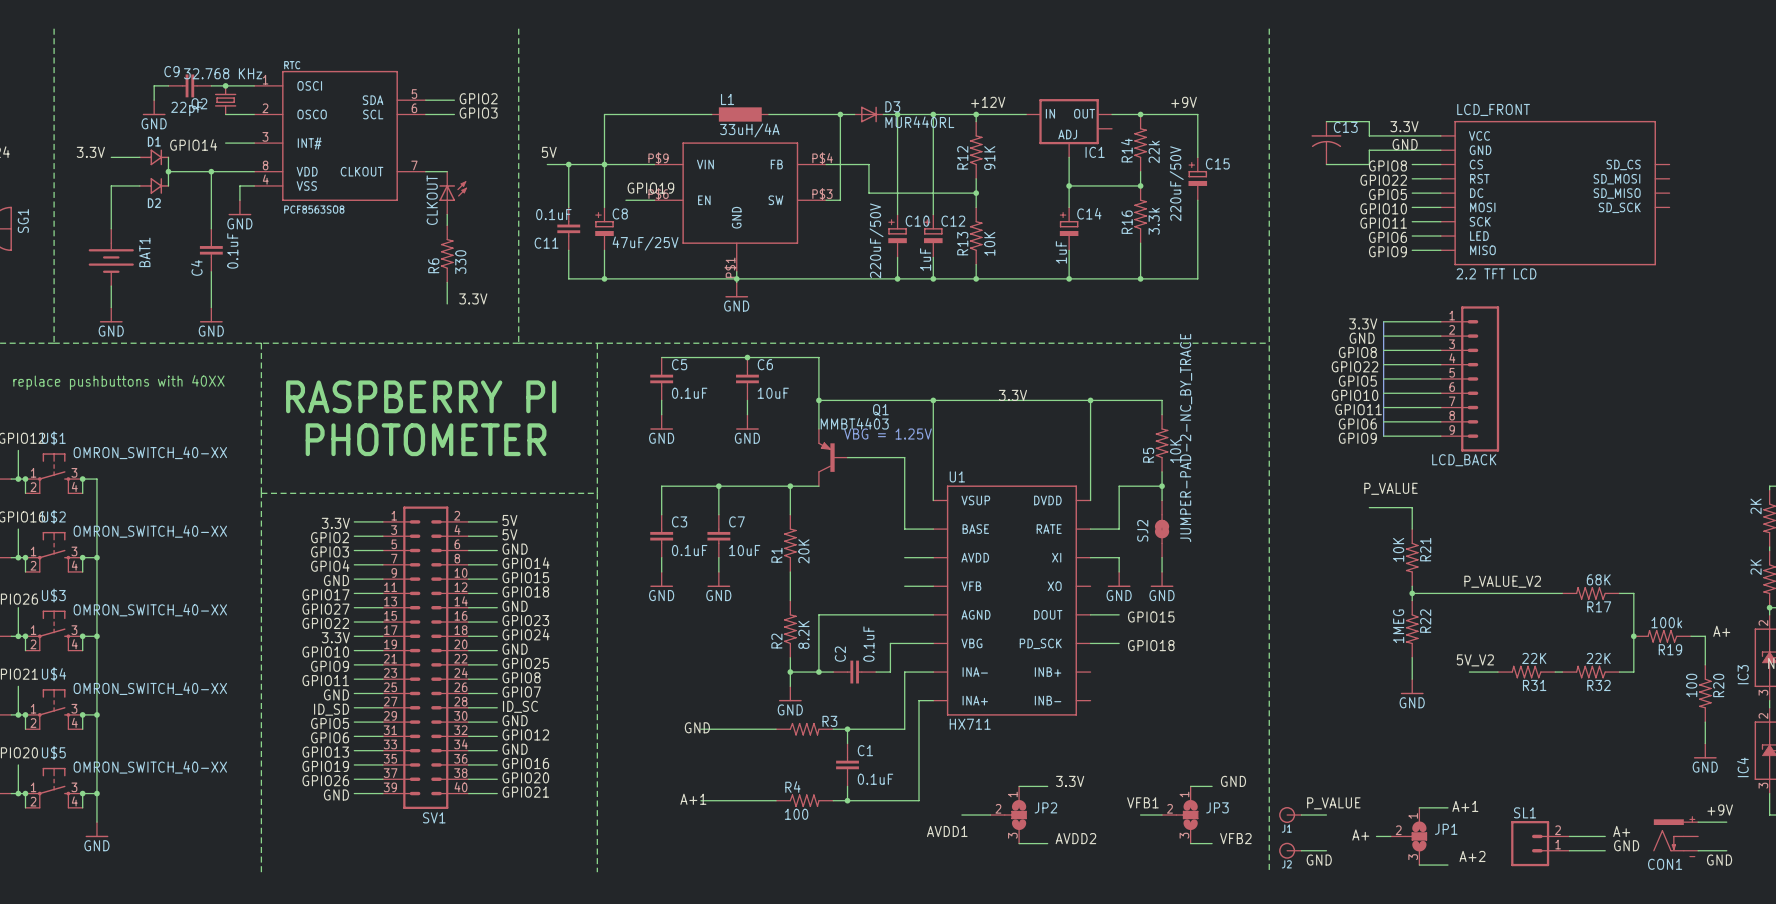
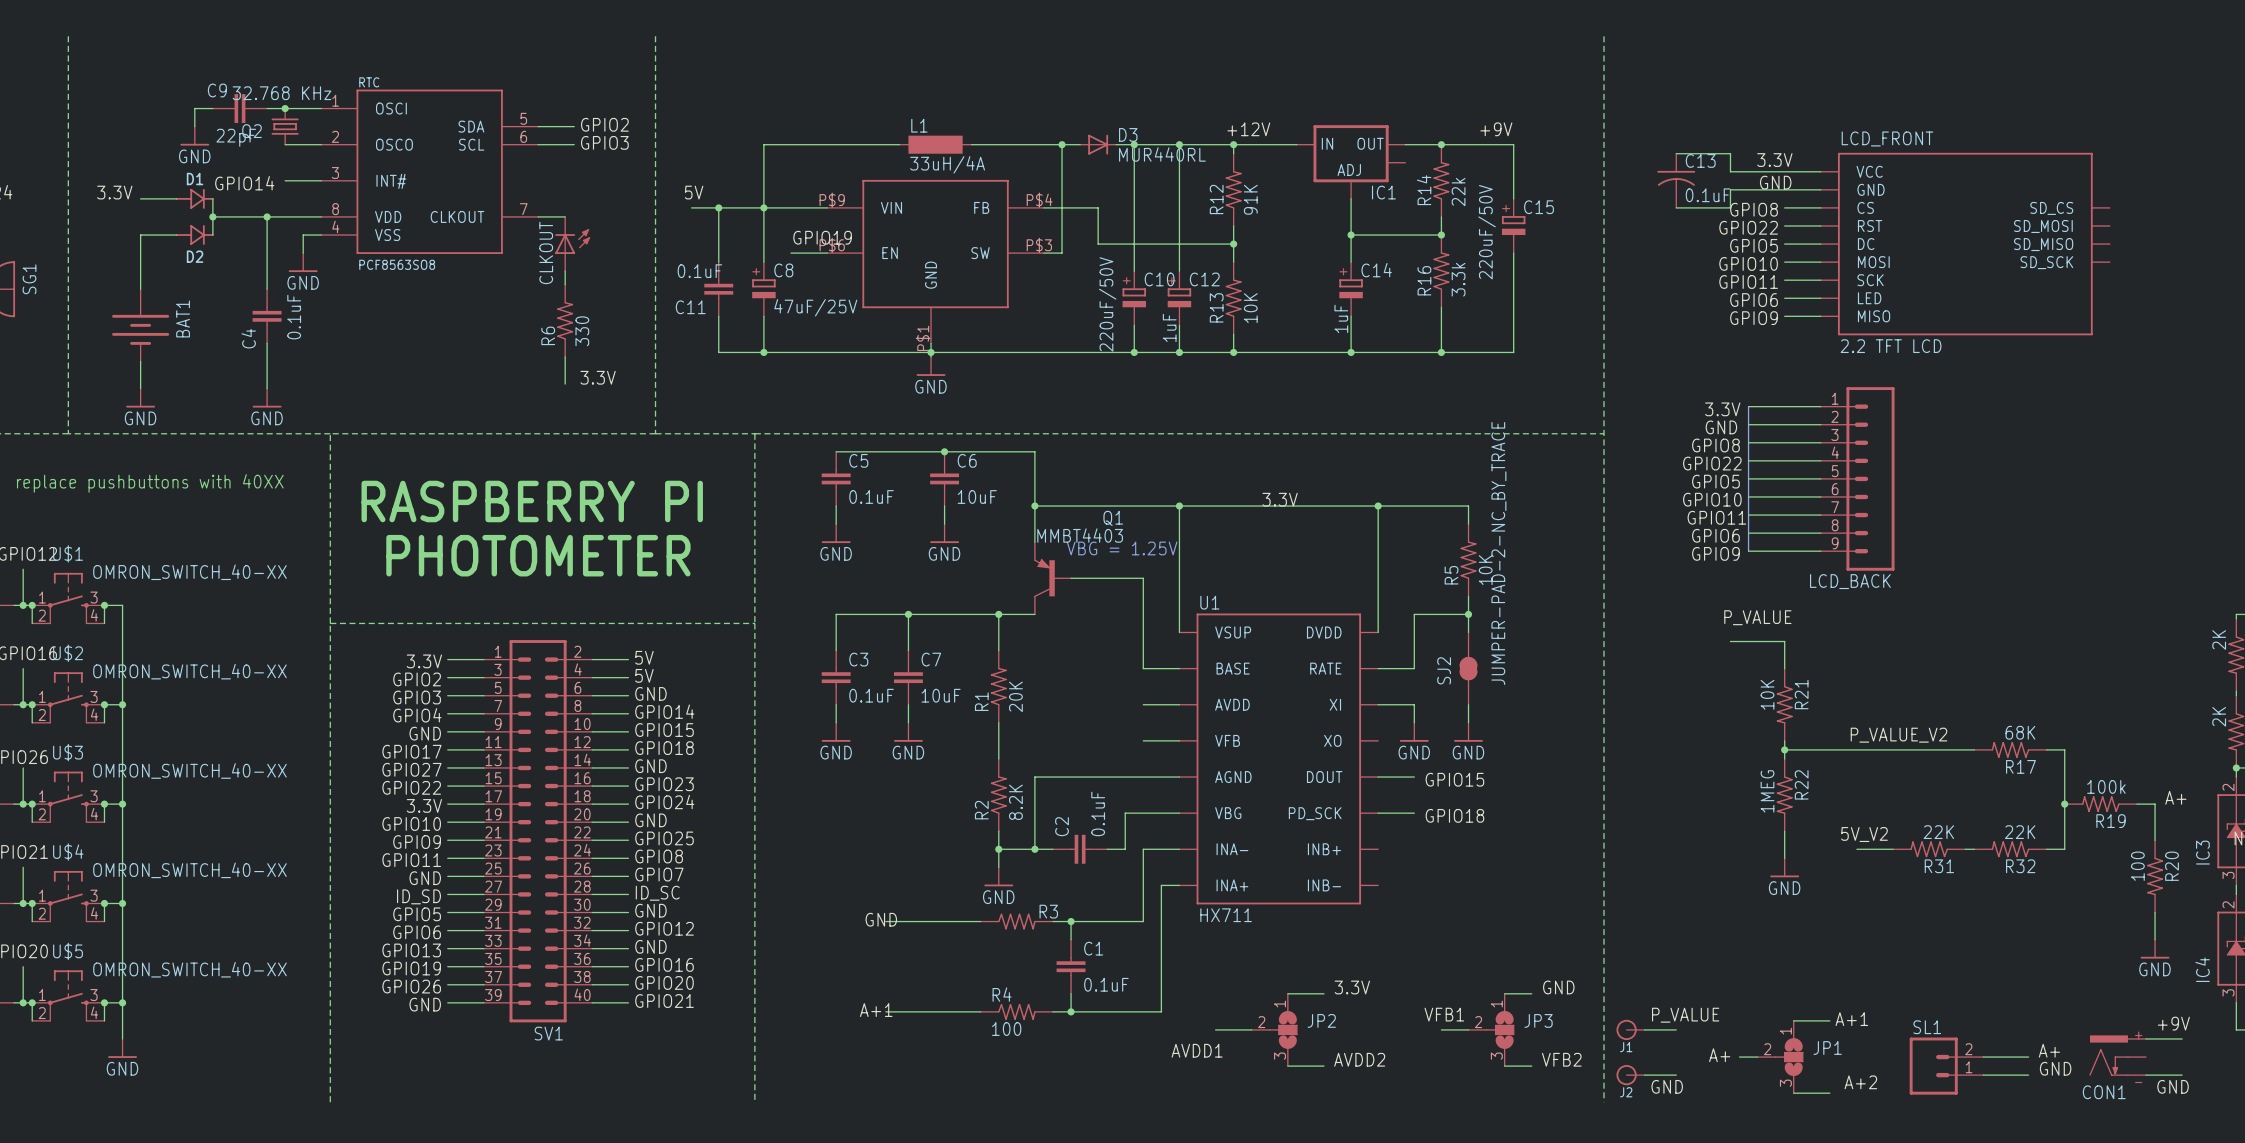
C13 value: none -> 0.1uF (1708, 195)

